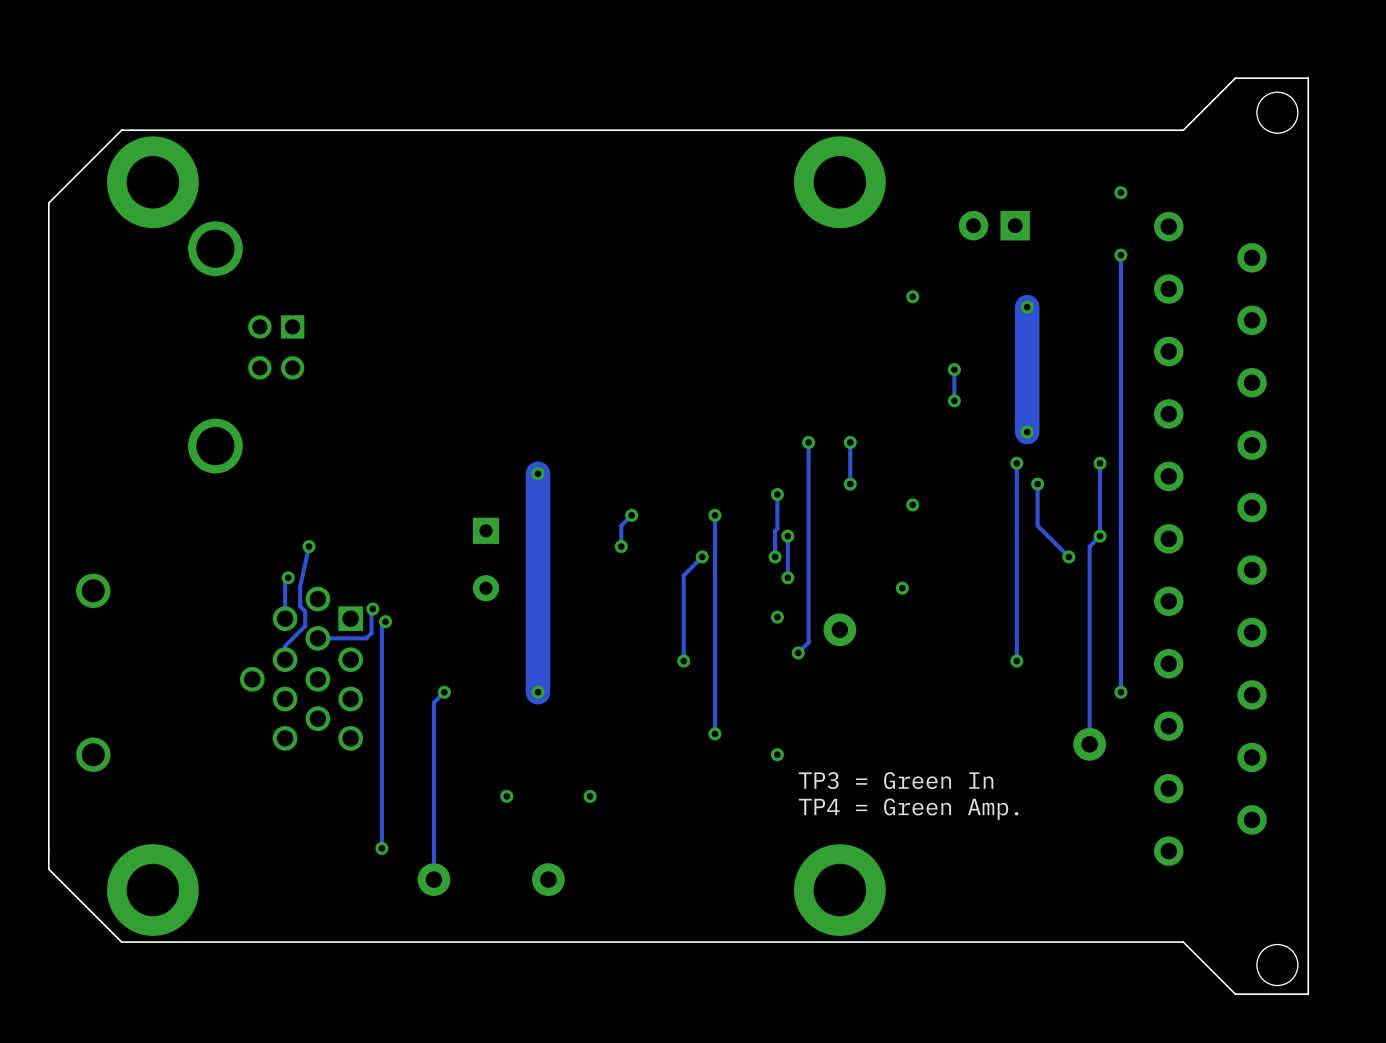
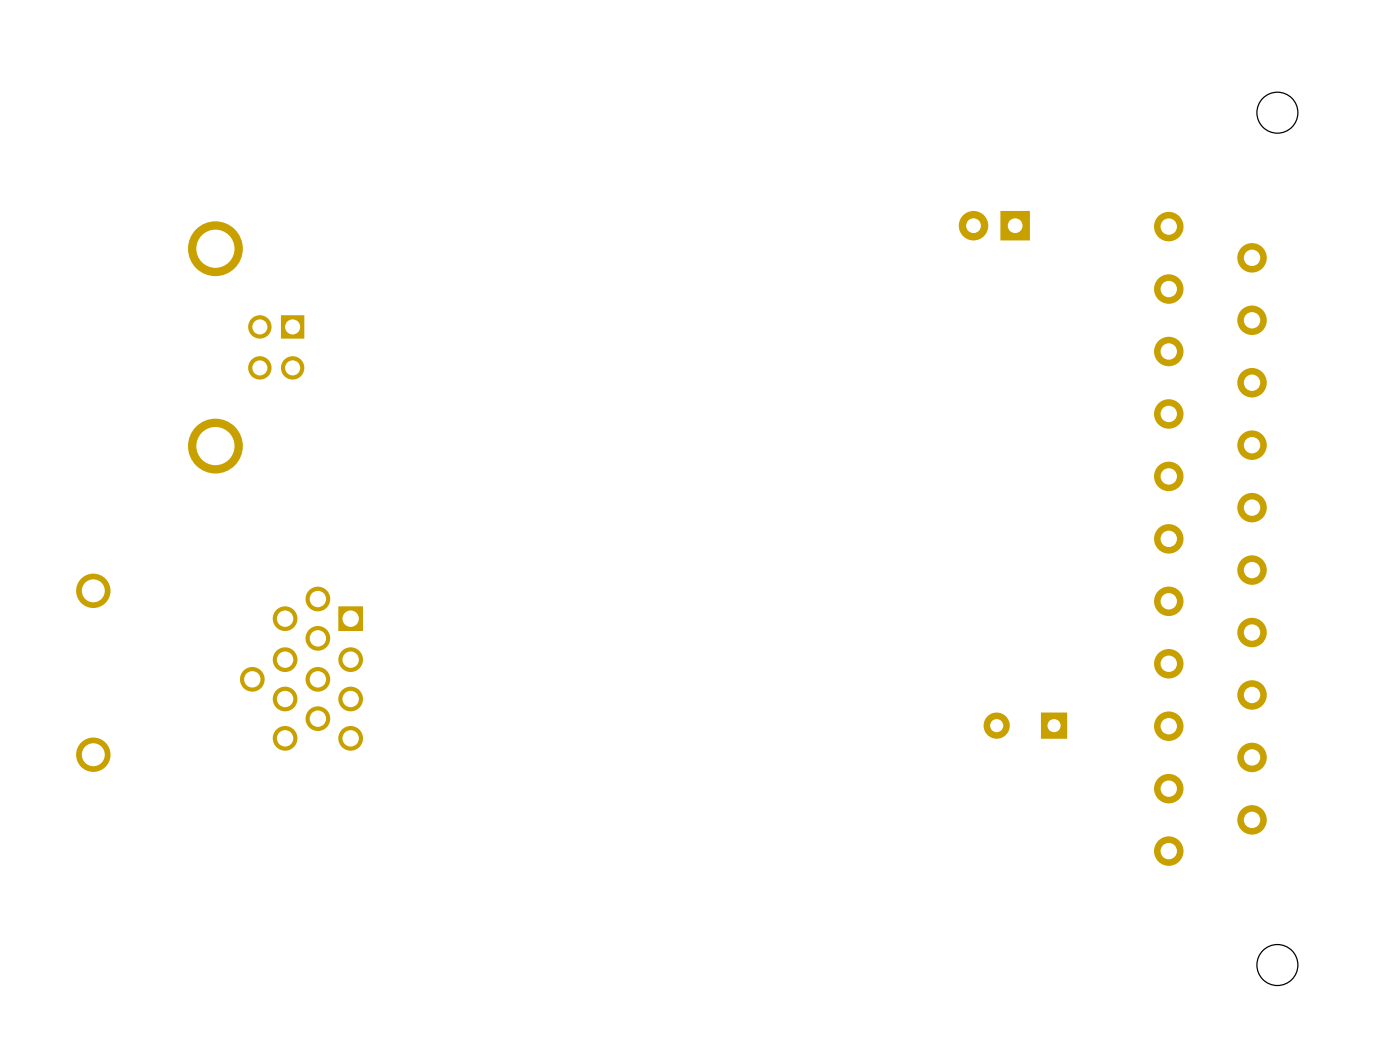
board edge: (1308, 78) (1235, 78) (1183, 130) (121, 130) (48, 203) (48, 869) (121, 942) (1183, 942) (1235, 994) (1308, 994) (1308, 78) -> none
part: (152, 182) -> none
part: (839, 182) -> none
via: (1120, 192) -> none
track: (1120, 255) (1120, 692) -> none
via: (1120, 255) -> none
via: (912, 296) -> none
track: (1027, 307) (1027, 432) -> none
via: (1027, 307) -> none
track: (954, 369) (954, 400) -> none
via: (954, 369) -> none
via: (954, 400) -> none
via: (1027, 432) -> none
track: (808, 442) (808, 642) (798, 652) -> none
via: (808, 442) -> none
track: (850, 442) (850, 484) -> none
via: (850, 442) -> none
track: (1016, 463) (1016, 661) -> none
via: (1016, 463) -> none
track: (1100, 463) (1100, 536) (1089, 546) (1089, 744) -> none
via: (1100, 463) -> none
track: (538, 473) (538, 692) -> none
via: (538, 473) -> none
via: (850, 484) -> none
track: (1037, 484) (1037, 525) (1068, 556) -> none
via: (1037, 484) -> none
track: (777, 494) (775, 556) -> none
via: (777, 494) -> none
via: (912, 504) -> none
track: (631, 515) (621, 525) (621, 546) -> none
via: (631, 515) -> none
track: (714, 515) (714, 733) -> none
via: (714, 515) -> none
track: (787, 536) (787, 577) -> none
via: (787, 536) -> none
via: (1100, 536) -> none
track: (309, 546) (300, 586) (300, 606) (305, 611) (305, 626) (285, 646) (285, 659) -> none
via: (309, 546) -> none
via: (621, 546) -> none
track: (702, 556) (683, 575) (683, 661) -> none
via: (702, 556) -> none
via: (775, 556) -> none
via: (1068, 556) -> none
part: (485, 559) -> none
track: (288, 577) (285, 580) (285, 618) -> none
via: (288, 577) -> none
via: (787, 577) -> none
via: (902, 588) -> none
track: (372, 609) (371, 633) (366, 638) (317, 638) -> none
via: (372, 609) -> none
via: (777, 617) -> none
track: (385, 621) (381, 625) (381, 848) -> none
via: (385, 621) -> none
part: (839, 629) -> none
via: (798, 652) -> none
via: (683, 661) -> none
via: (1016, 661) -> none
track: (444, 692) (433, 702) (433, 879) -> none
via: (444, 692) -> none
via: (538, 692) -> none
via: (1120, 692) -> none
part: none -> (1025, 725)
via: (714, 733) -> none
part: (1089, 744) -> none
via: (777, 754) -> none
text: TP3 = Green In (896, 780) -> none
via: (506, 796) -> none
via: (590, 796) -> none
text: TP4 = Green Amp. (908, 809) -> none
via: (381, 848) -> none
part: (433, 879) -> none
part: (548, 879) -> none
part: (152, 890) -> none
part: (839, 890) -> none

